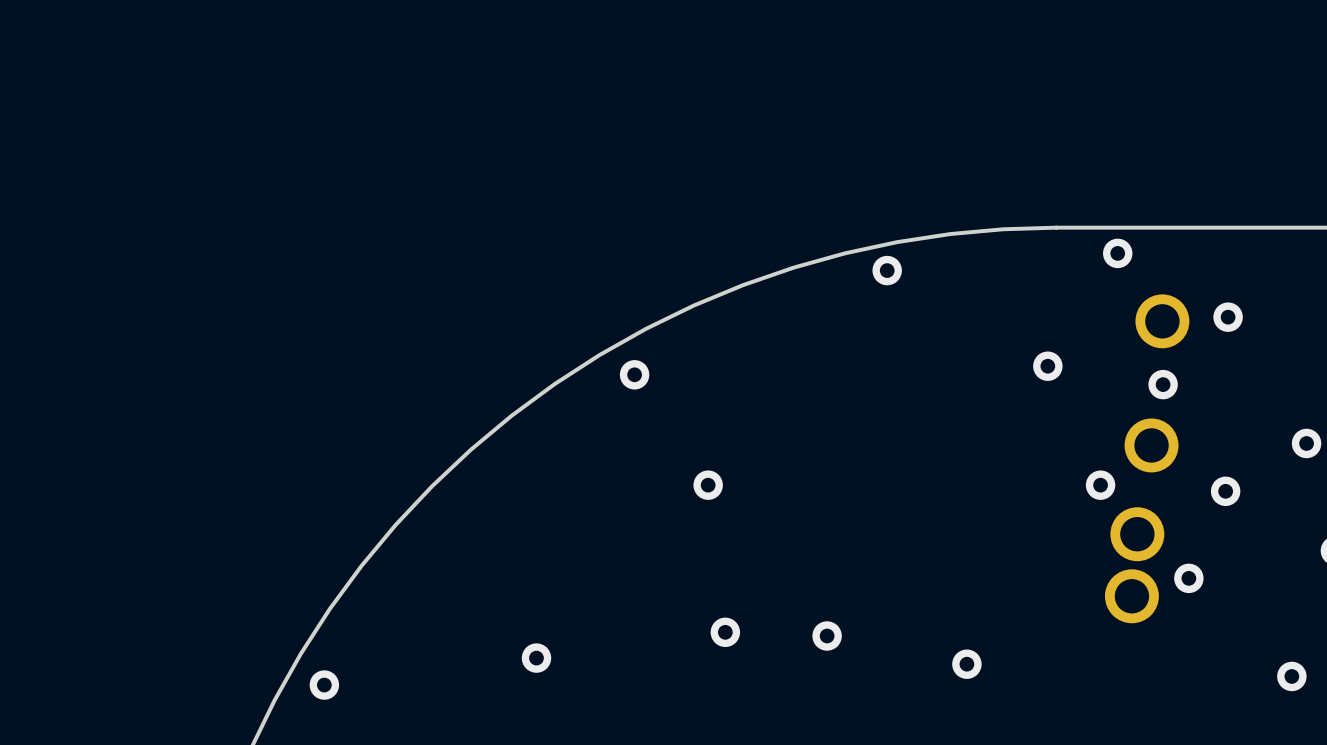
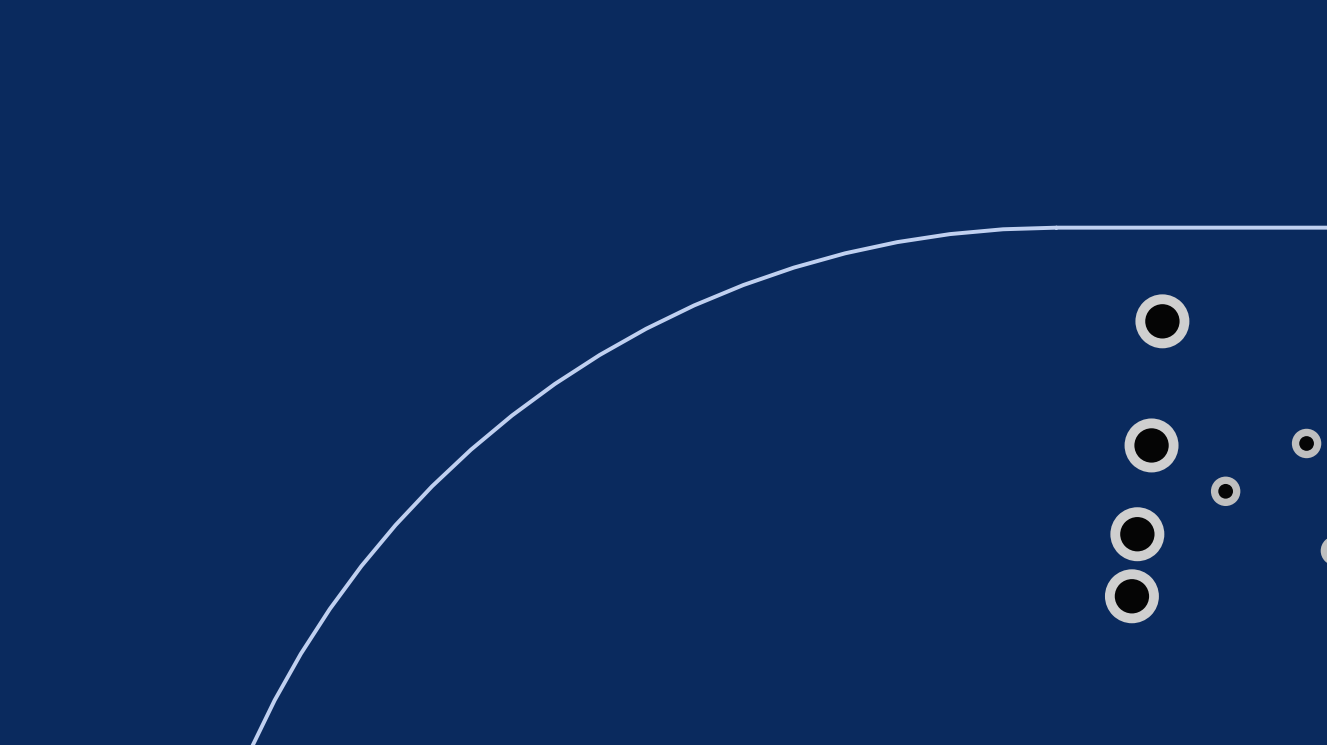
via: (1117, 253) -> none
via: (887, 270) -> none
via: (1228, 317) -> none
via: (1047, 366) -> none
via: (634, 374) -> none
via: (1163, 384) -> none
via: (708, 485) -> none
via: (1100, 485) -> none
via: (1188, 578) -> none
via: (725, 632) -> none
via: (827, 636) -> none
via: (536, 658) -> none
via: (966, 664) -> none
via: (1291, 676) -> none
via: (324, 685) -> none

